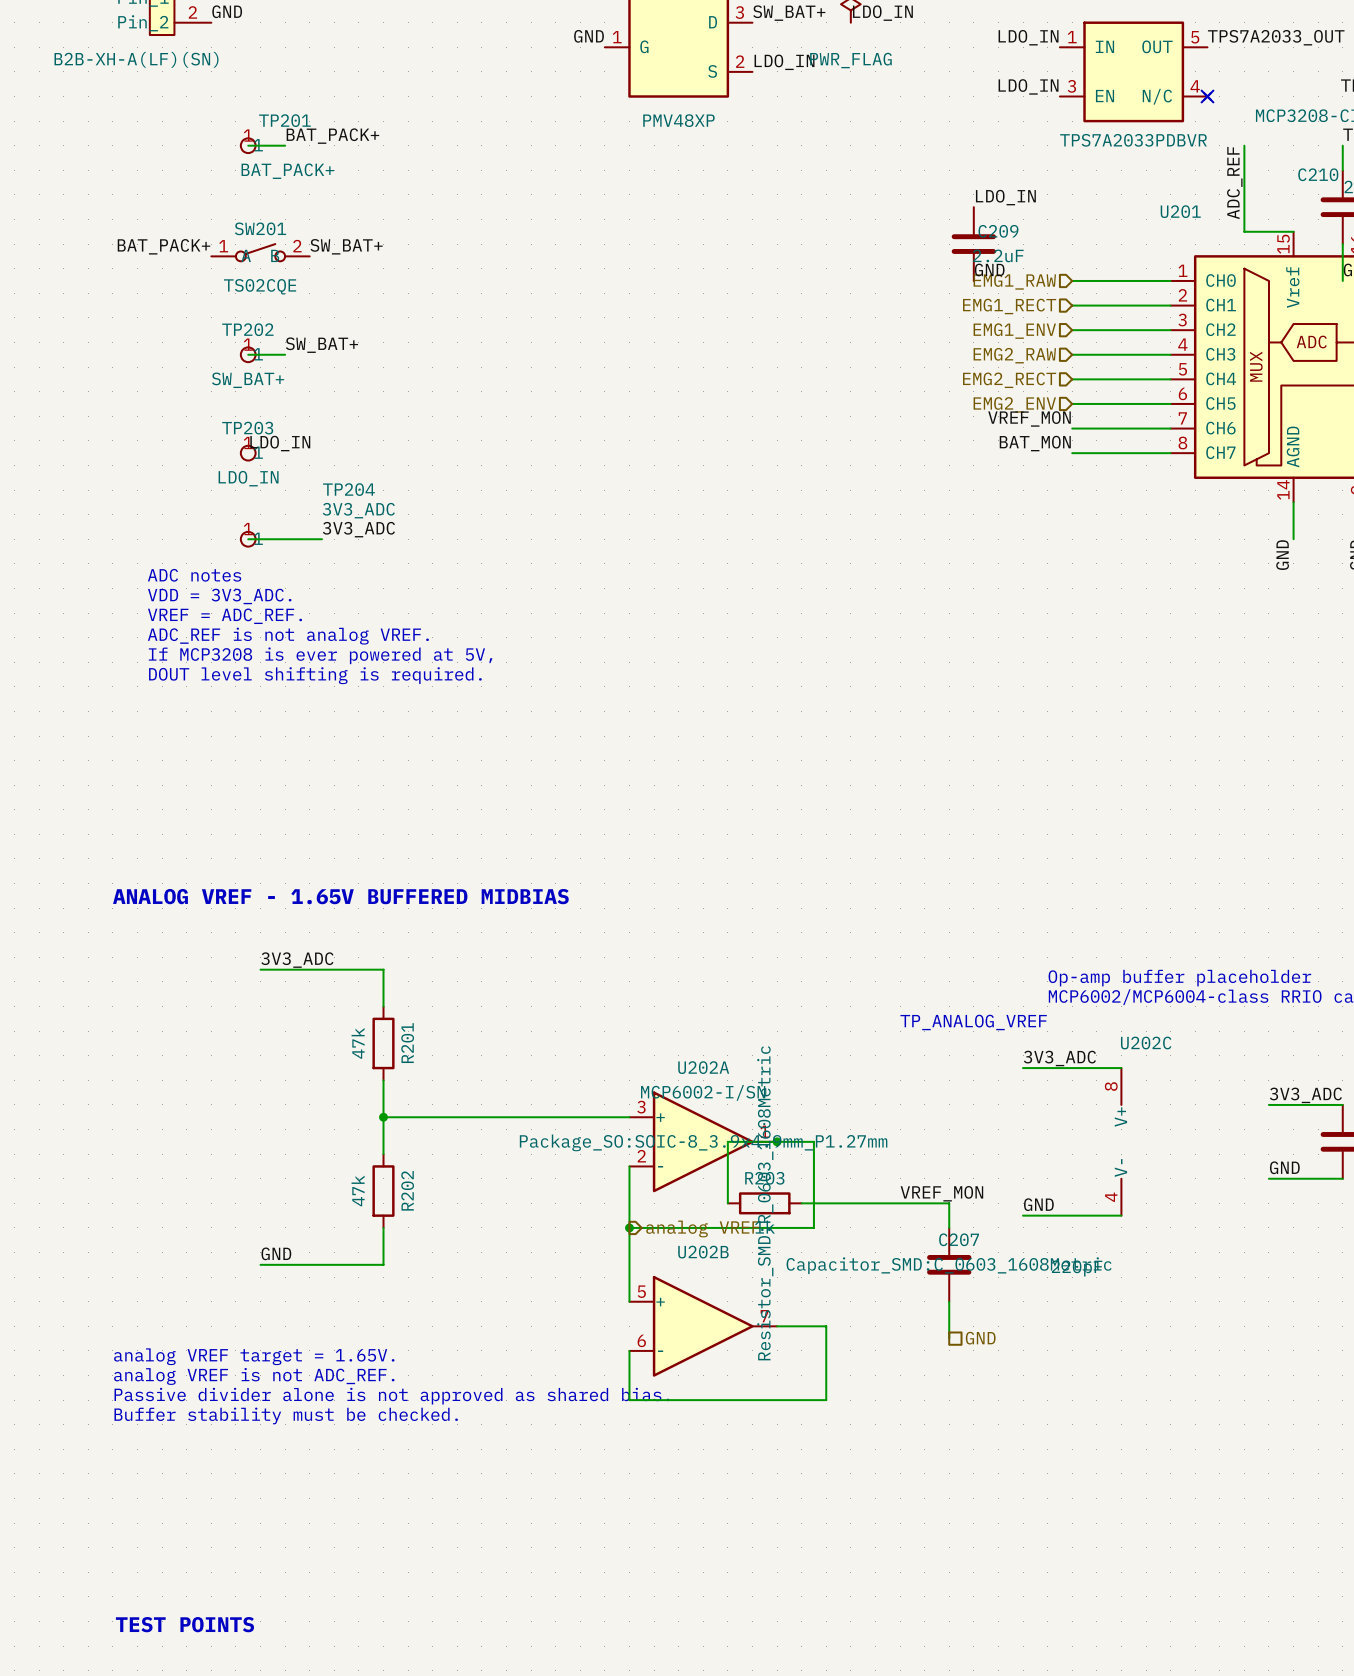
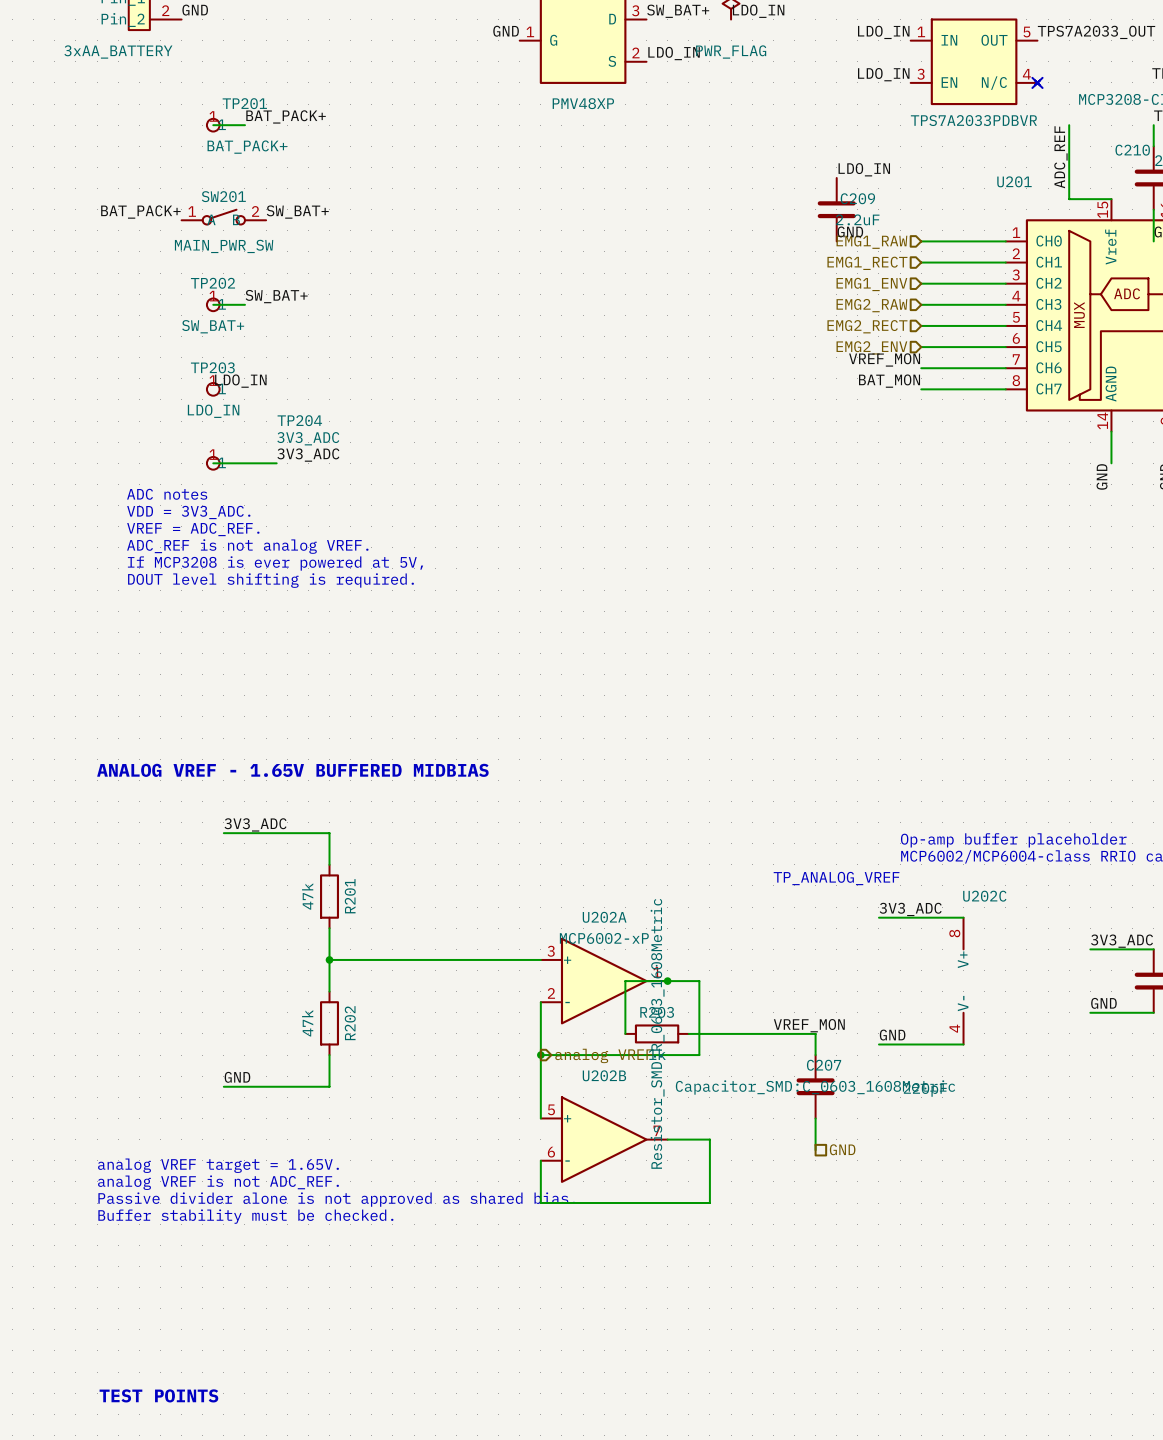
part value: B2B-XH-A(LF)(SN) (136, 59) -> 3xAA_BATTERY (118, 52)
SW201 value: TS02CQE (260, 286) -> MAIN_PWR_SW (224, 246)
U202A value: MCP6002-I/SN (703, 1092) -> MCP6002-xP (604, 938)
U202A text: Package_SO:SOIC-8_3.9x4.9mm_P1.27mm (703, 1142) -> none

